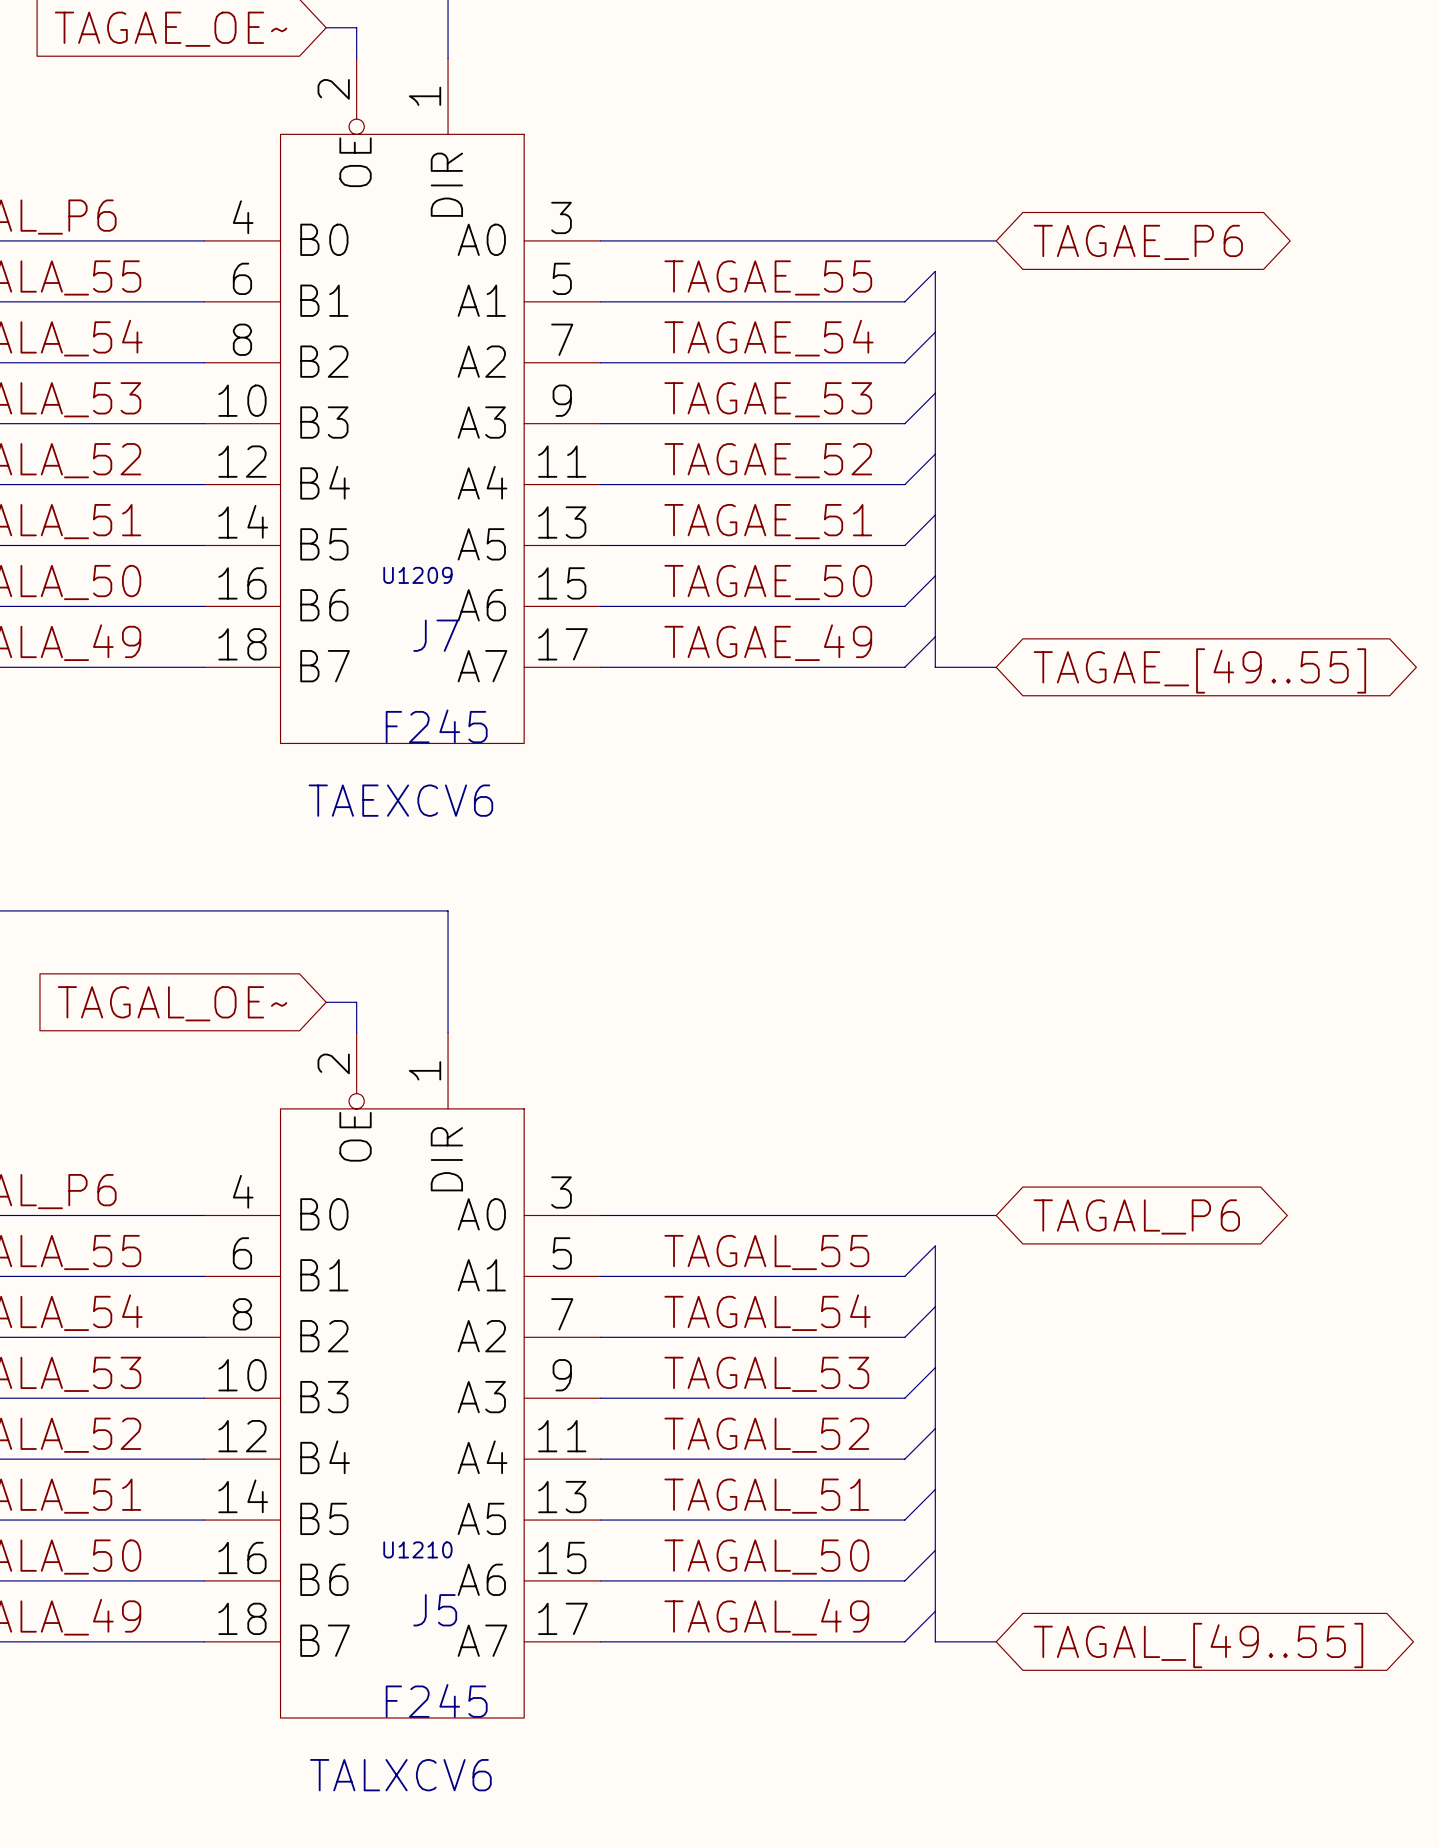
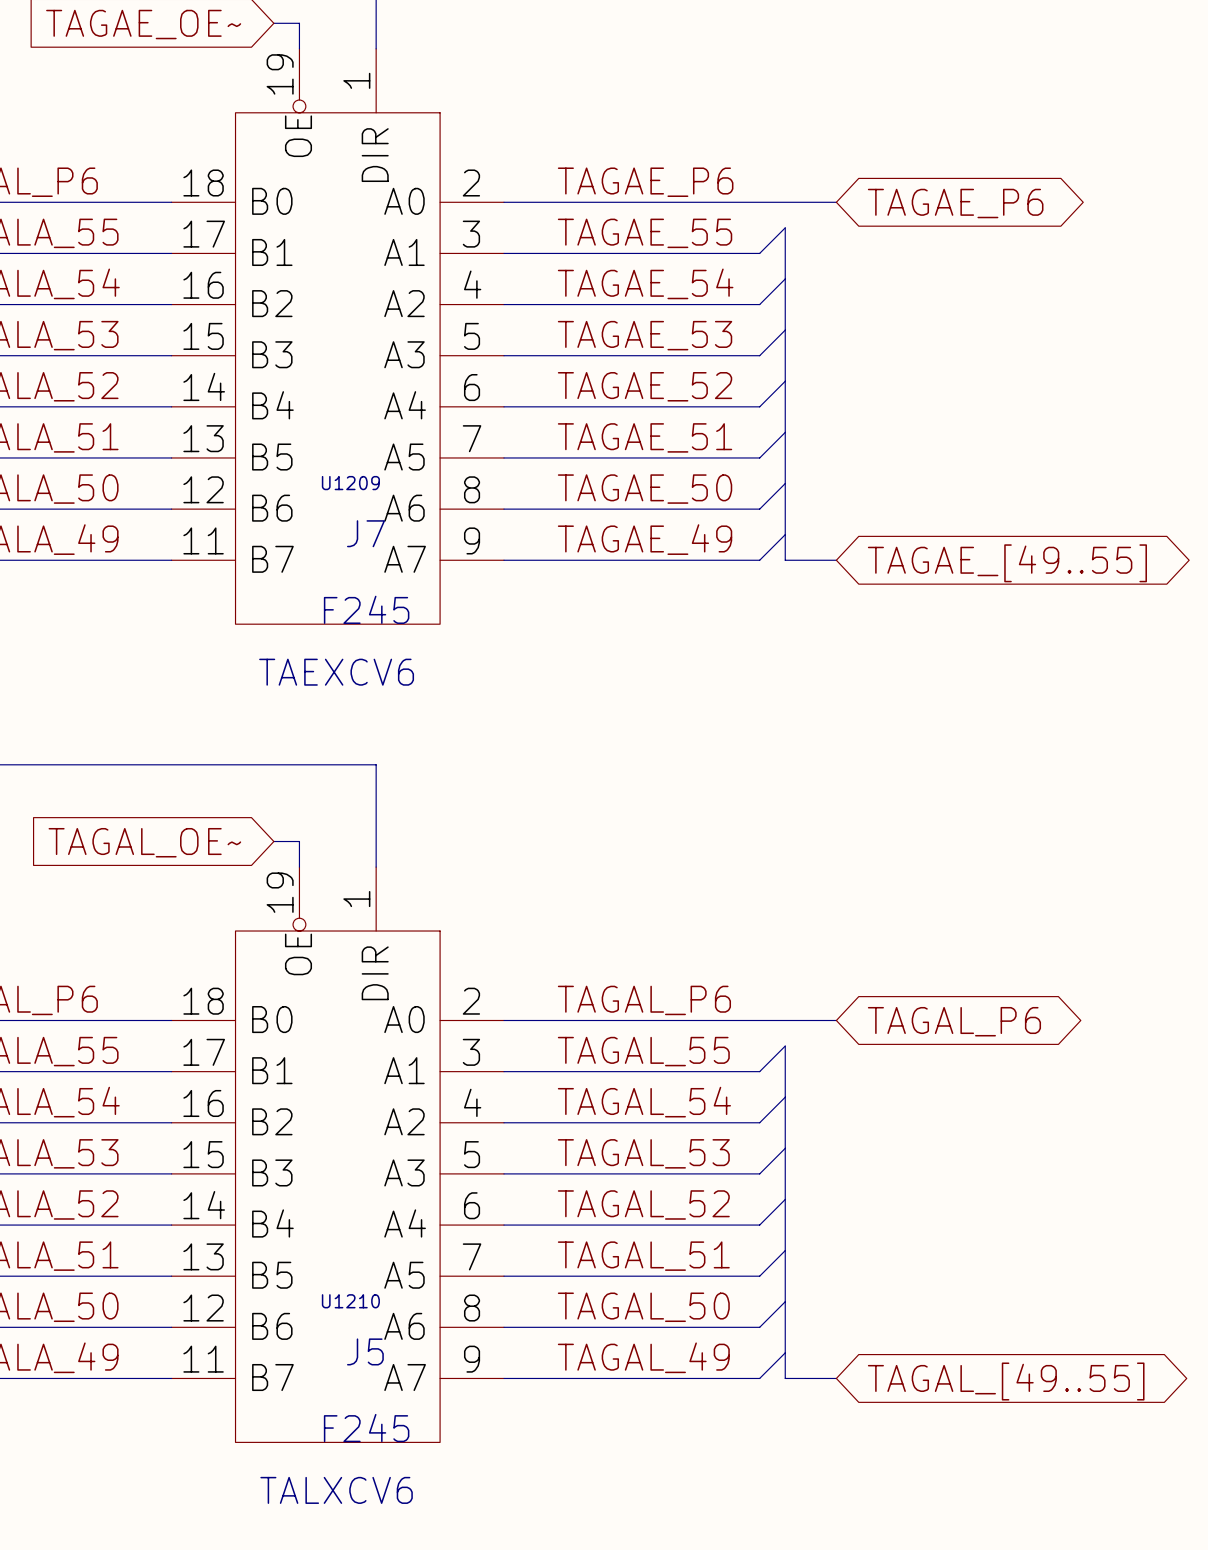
U1209 symbol: [204, 58, 601, 744] -> [171, 48, 504, 625]
label: none -> TAGAE_P6 (645, 182)
U1210 symbol: [204, 1032, 601, 1718] -> [171, 867, 504, 1443]
label: none -> TAGAL_P6 (644, 1000)

